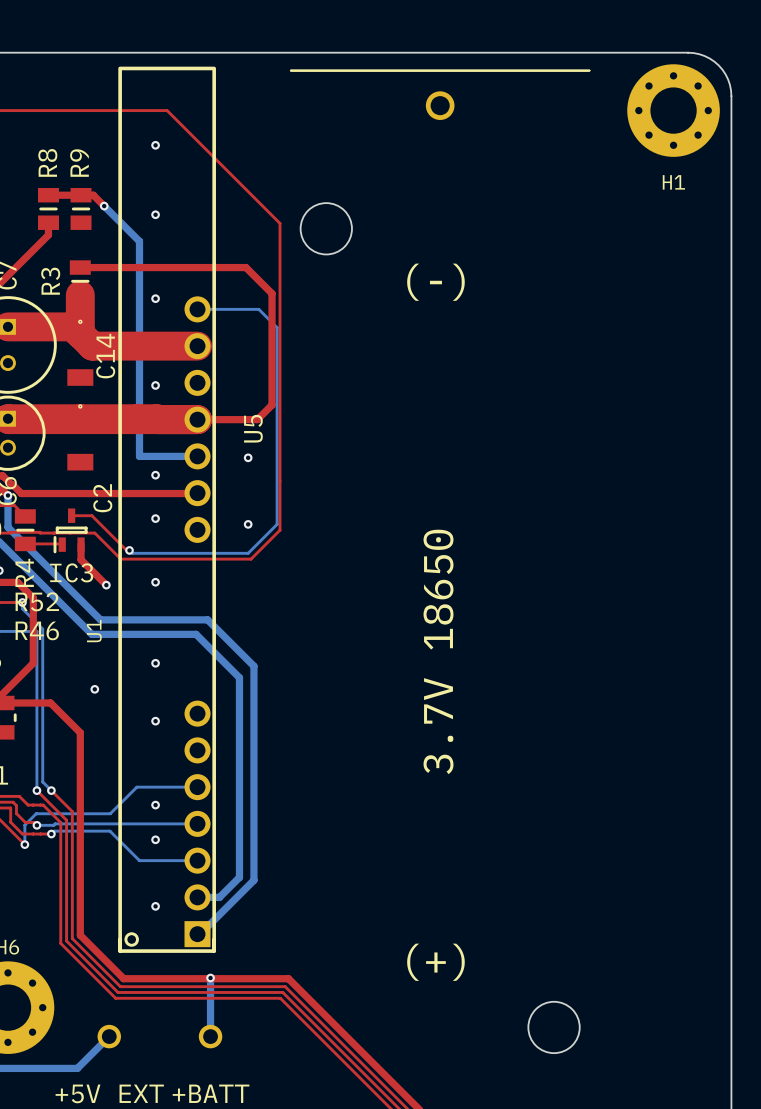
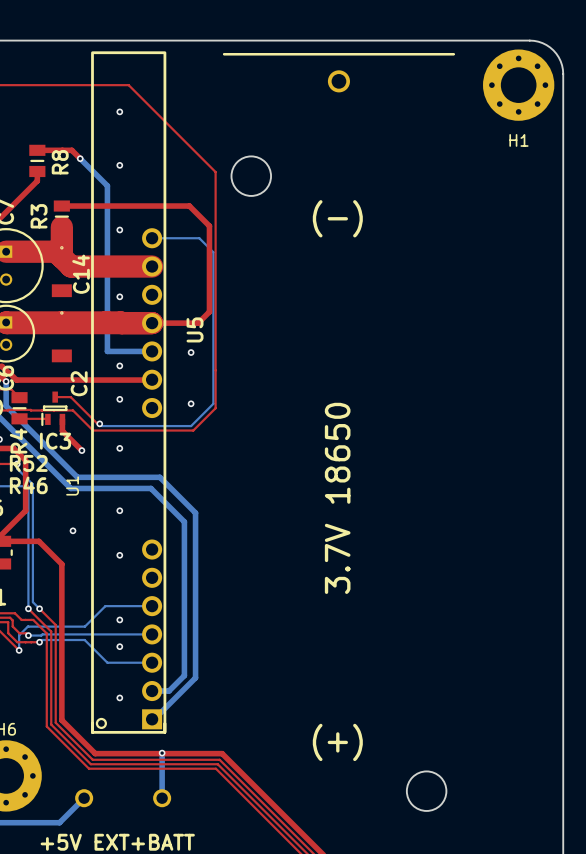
R8 name position: R8 (47, 162) -> R8 (60, 162)
R9: (81, 208) -> none

